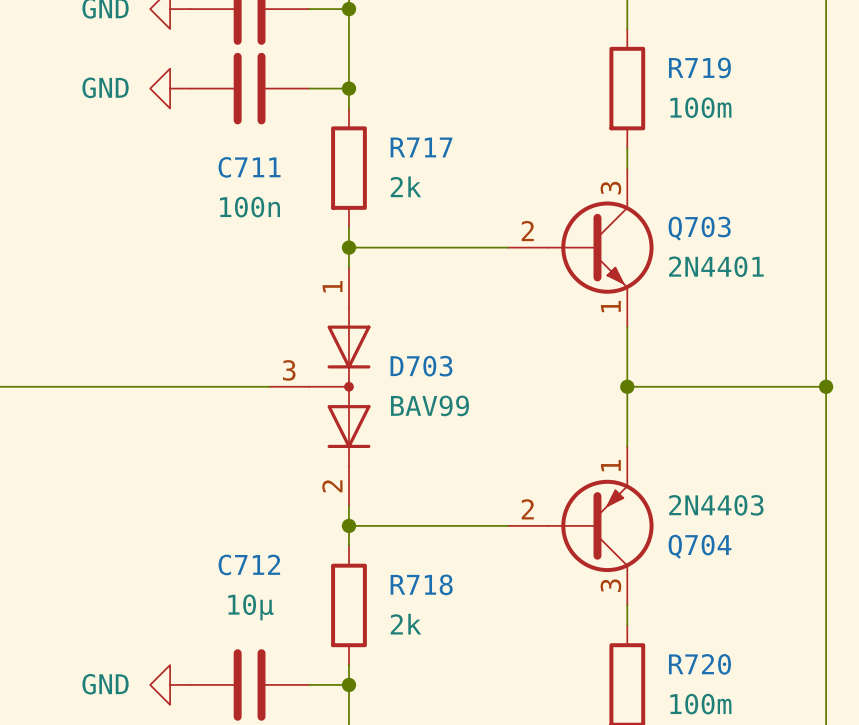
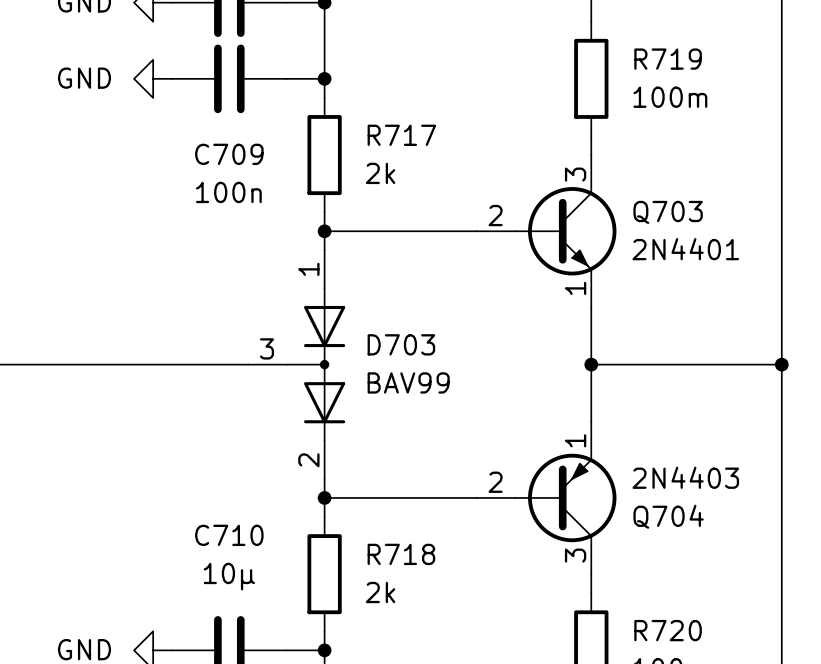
C711 name: C711 (249, 167) -> C709 (229, 154)
C712 name: C712 (249, 564) -> C710 (229, 535)

